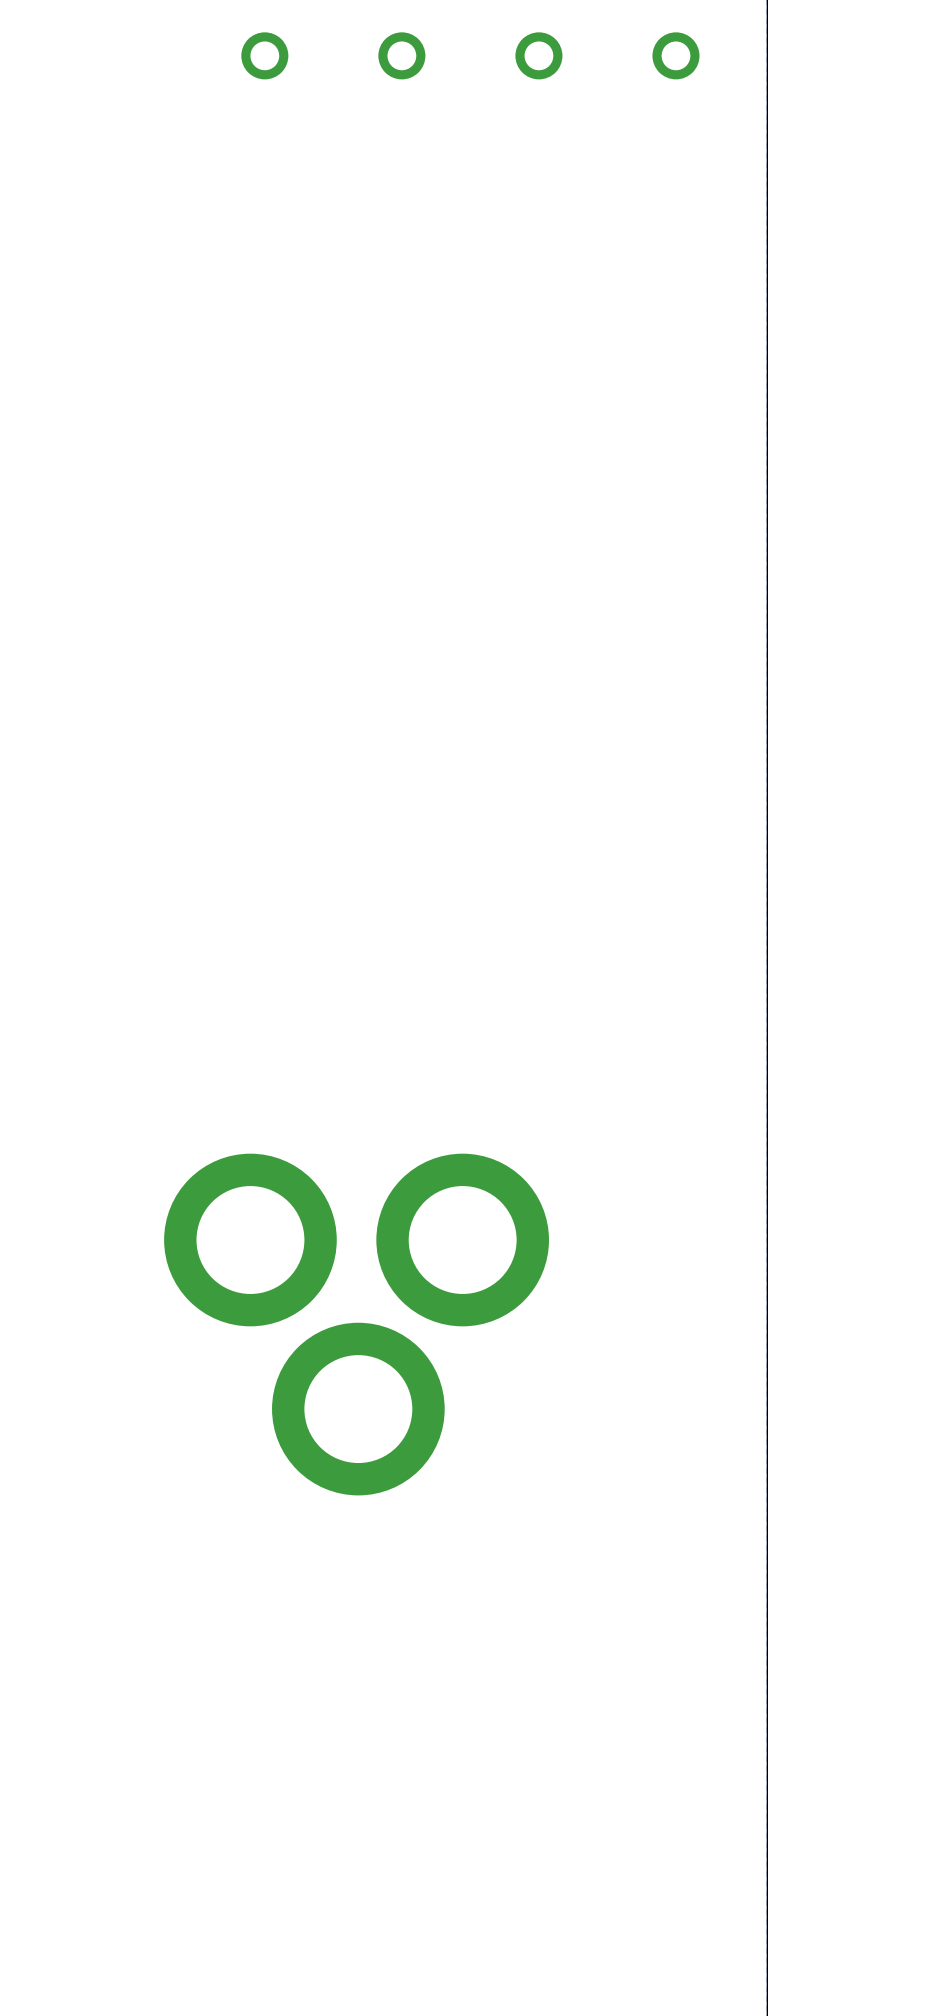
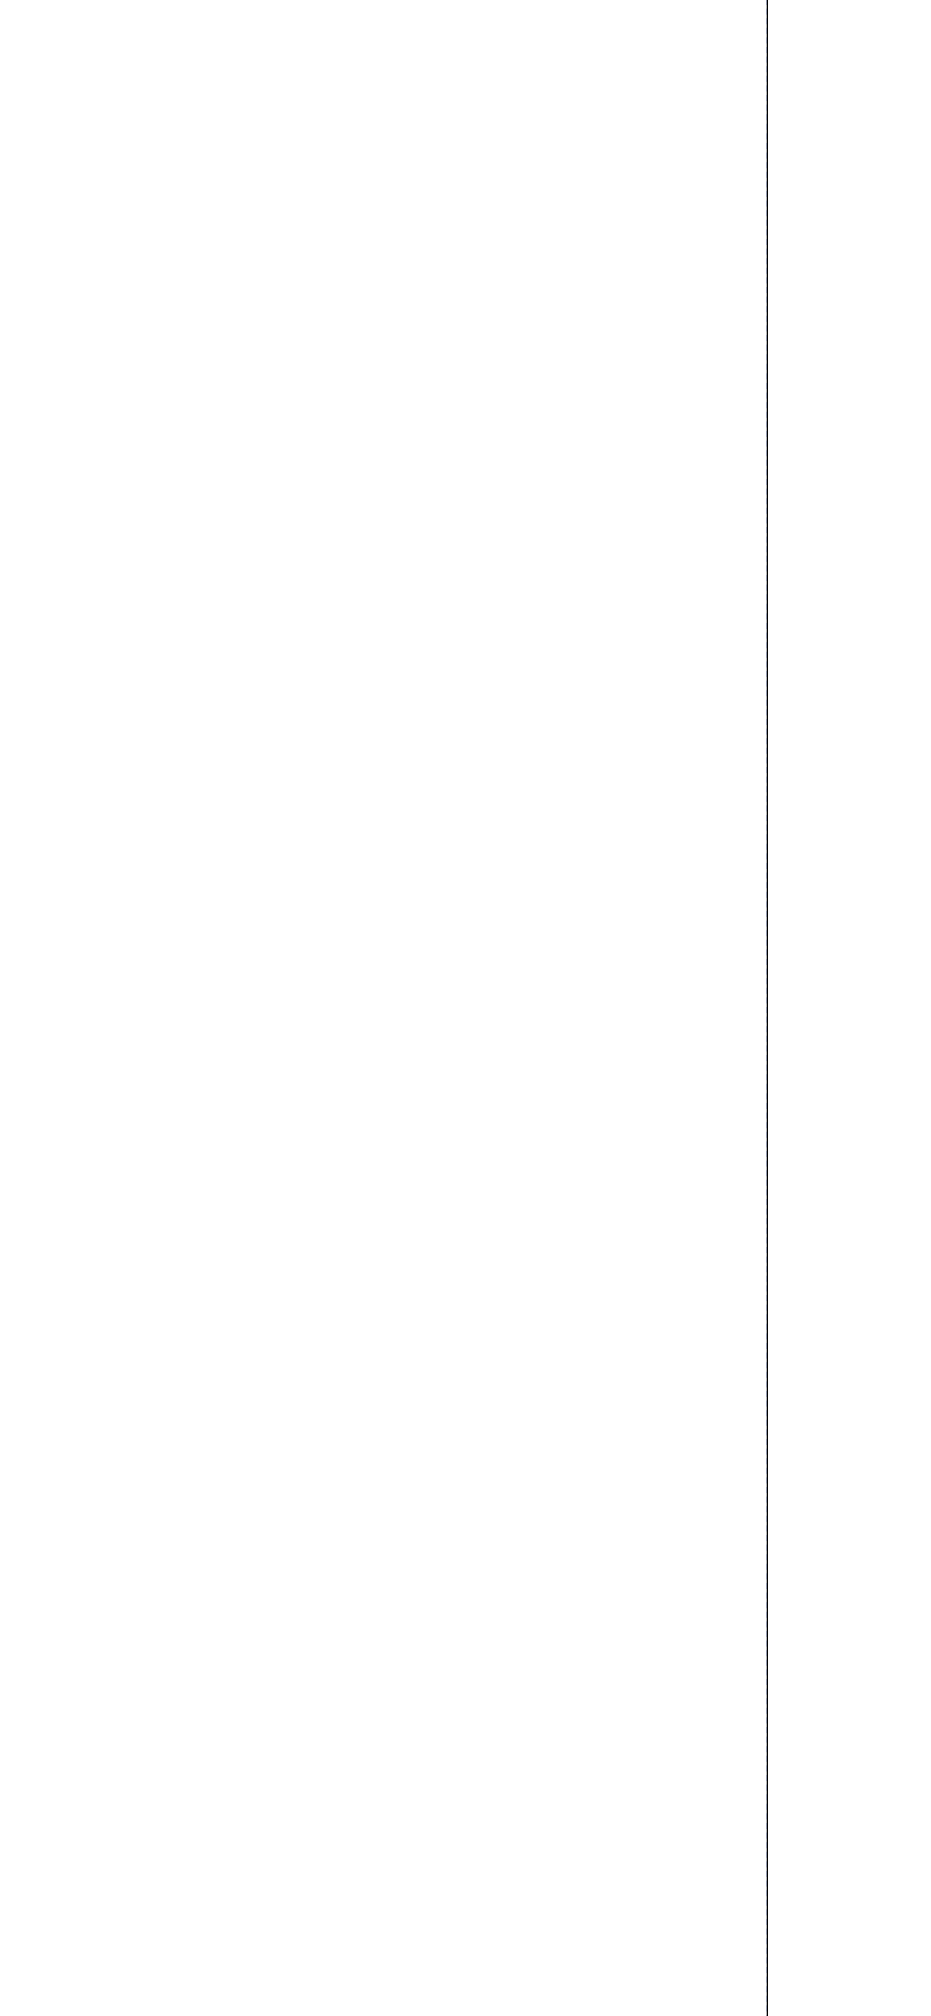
part: (264, 55) -> none
part: (401, 55) -> none
part: (538, 55) -> none
part: (675, 55) -> none
part: (356, 1324) -> none

